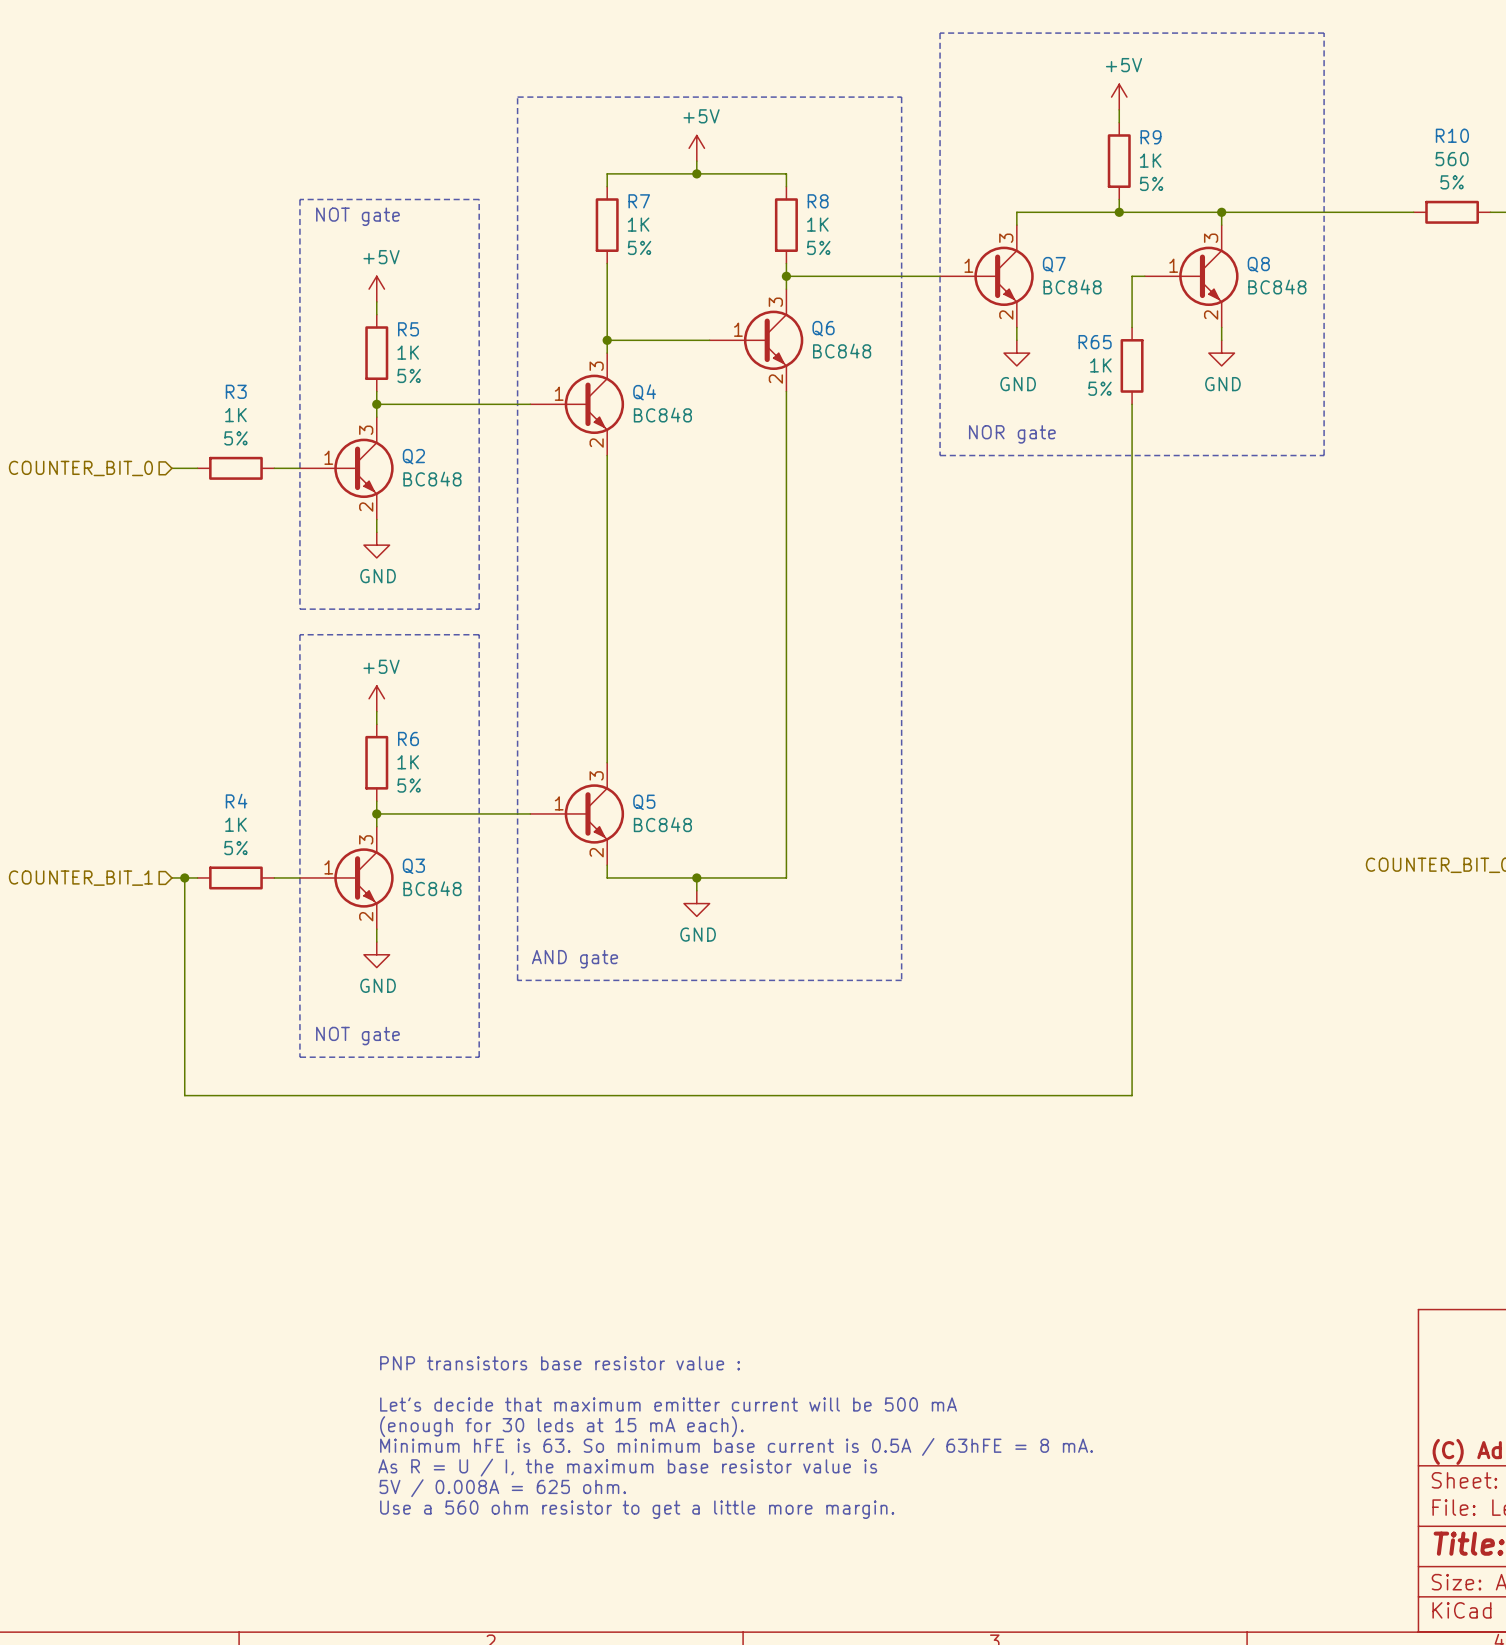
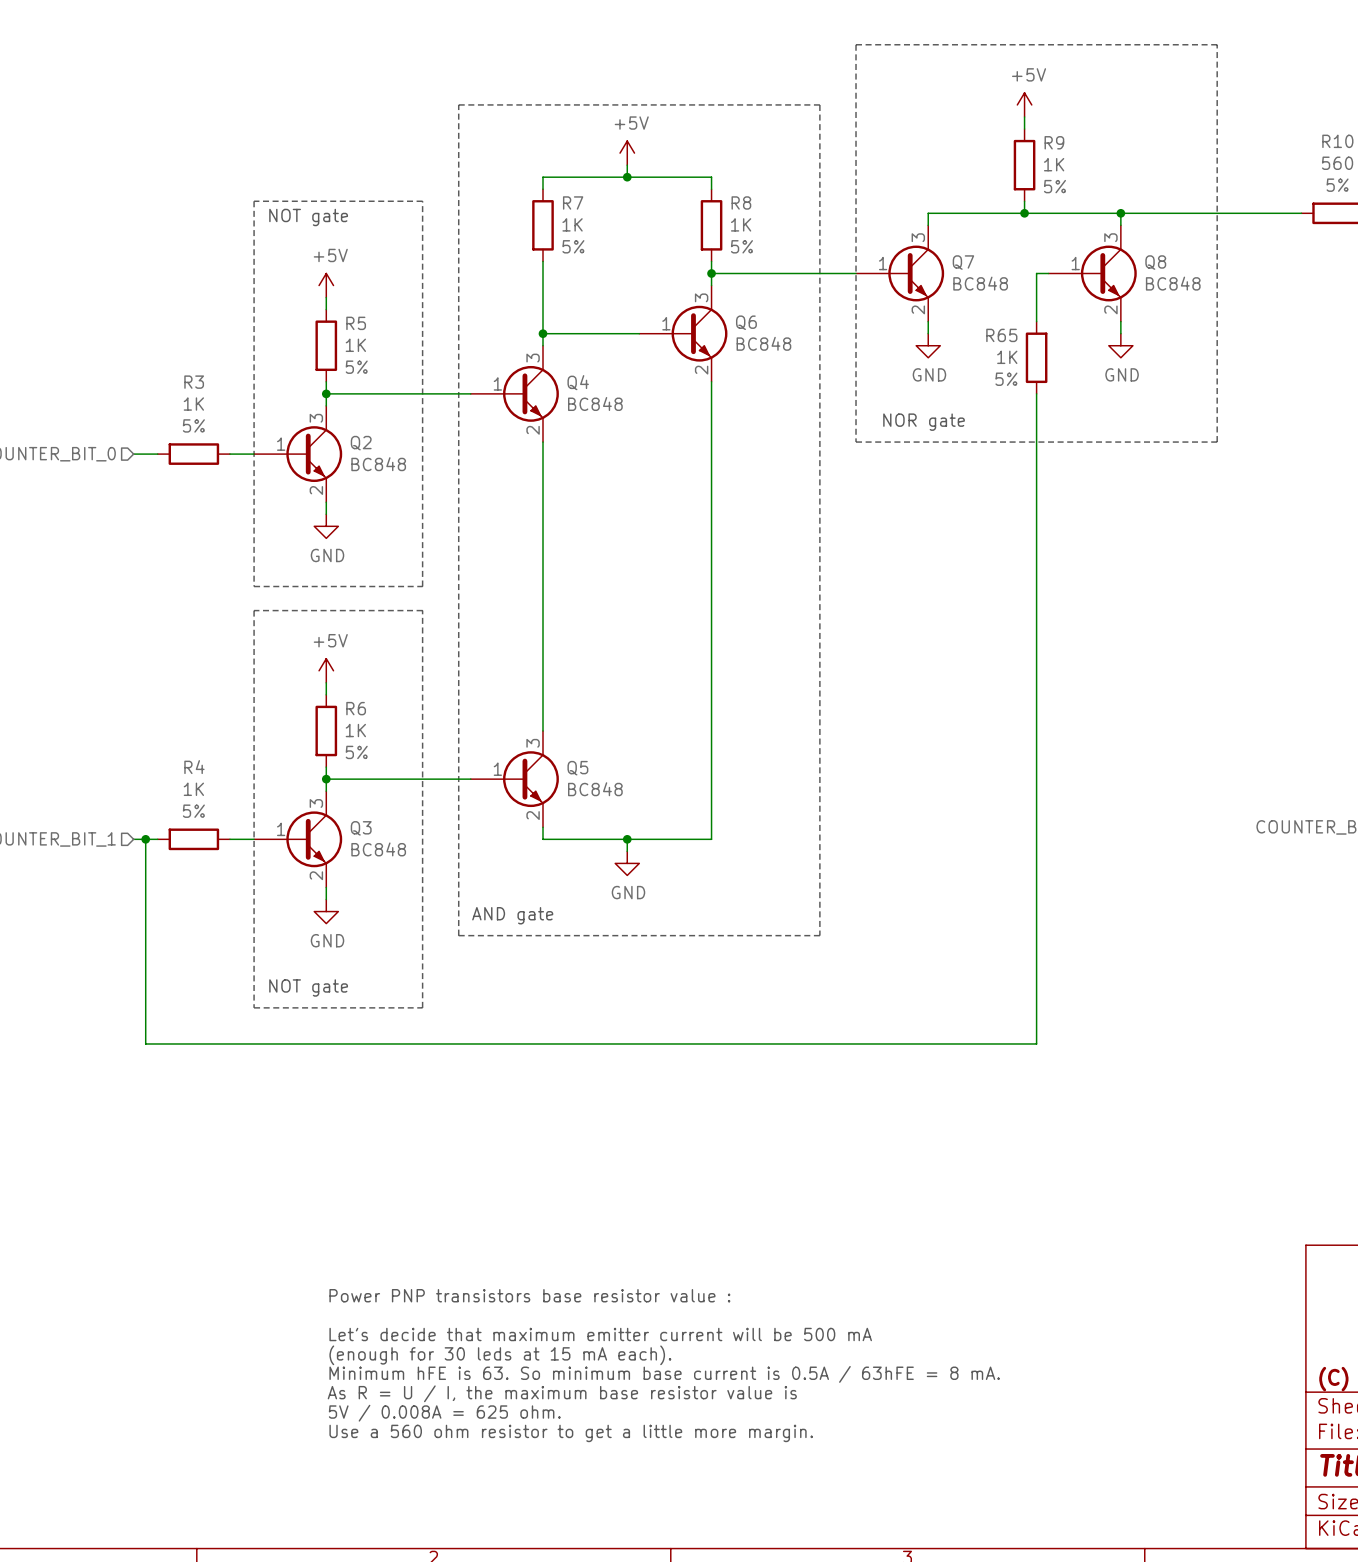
text: PNP transistors base resistor value : (560, 1363) -> Power PNP transistors base resistor value : (529, 1295)

